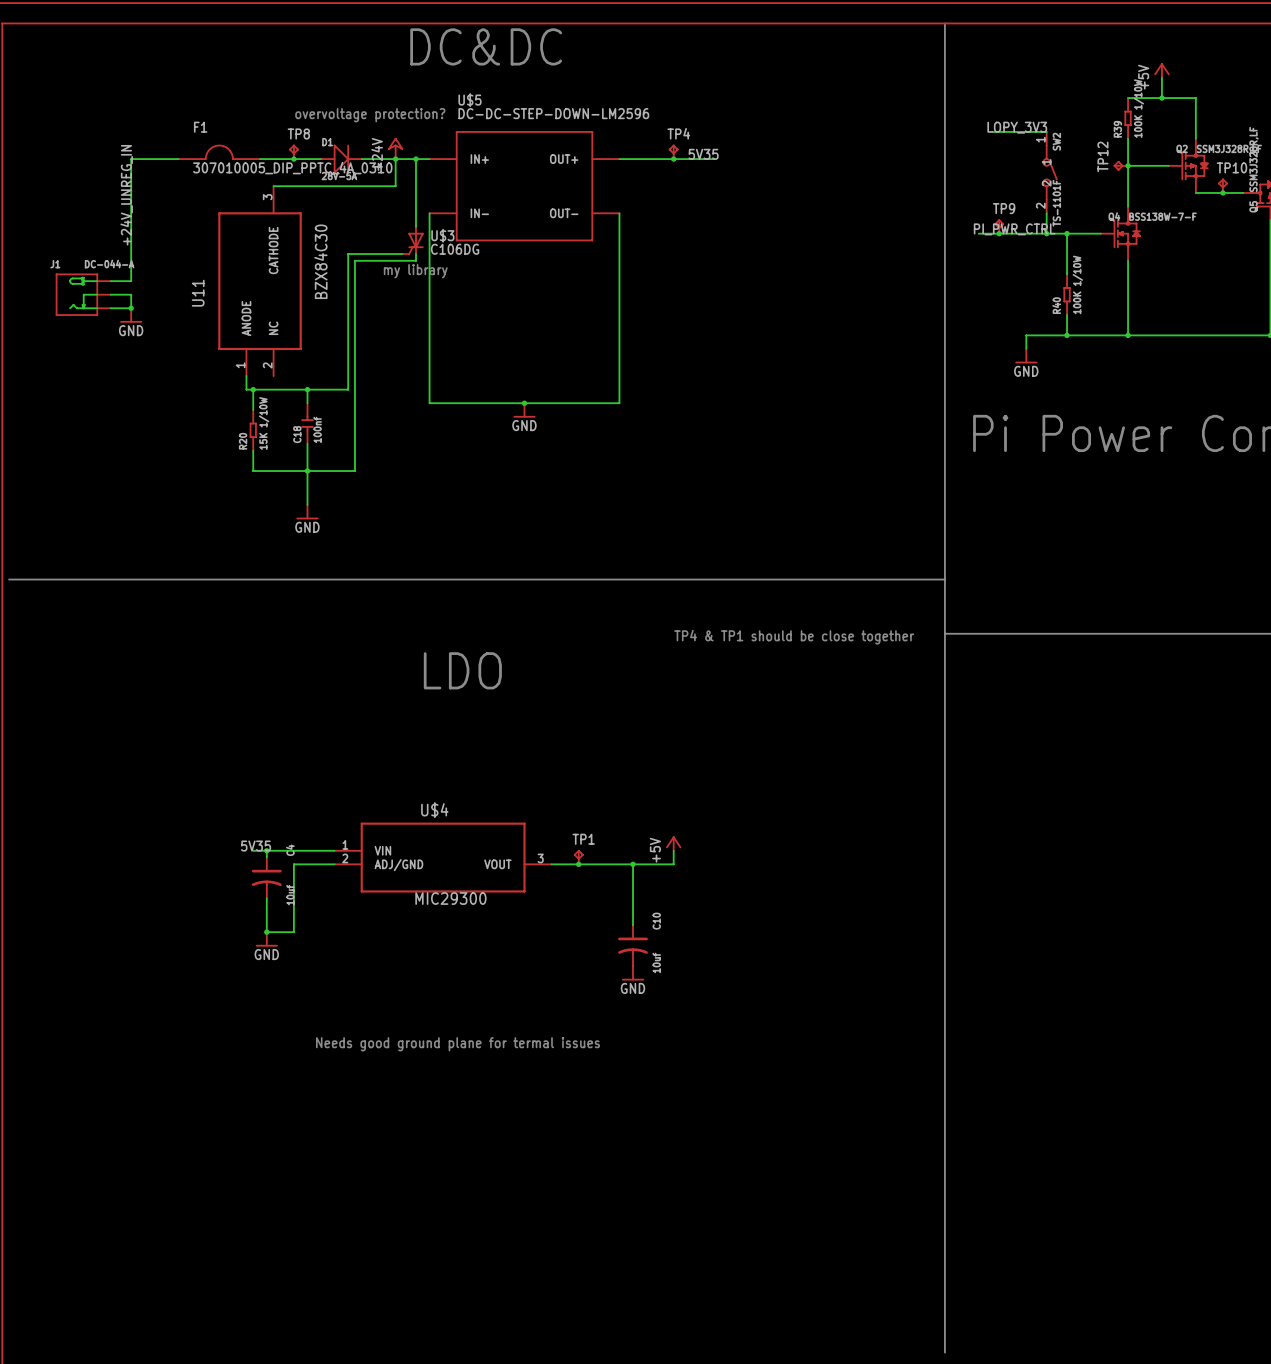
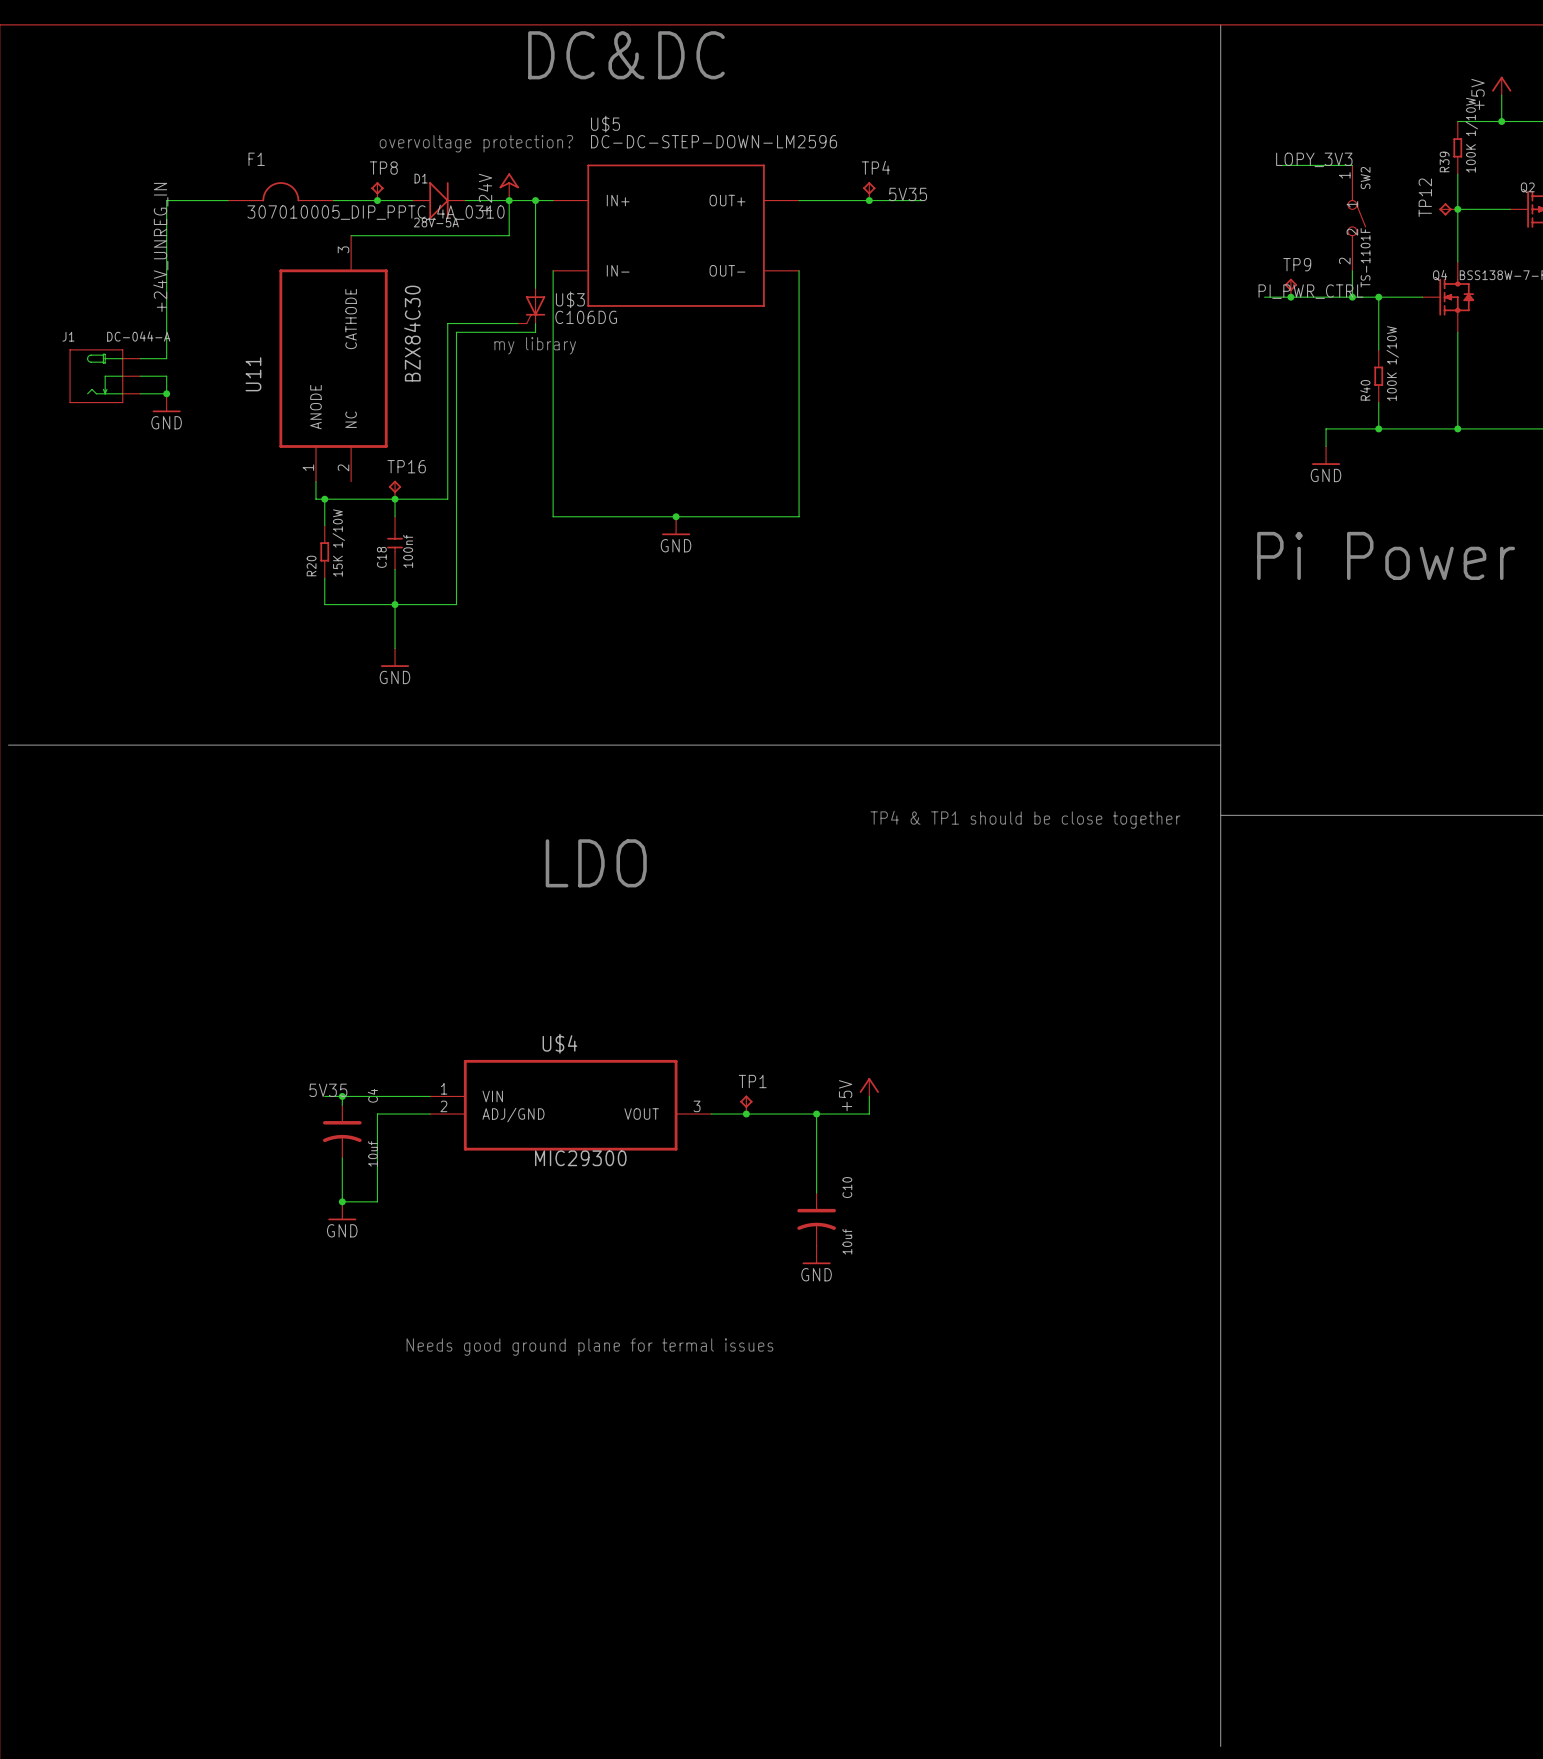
TP16: none -> (395, 489)

